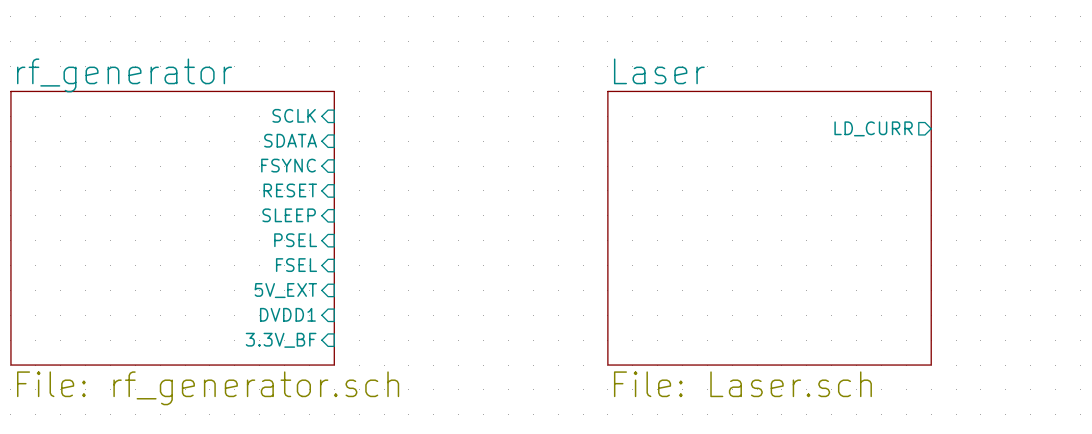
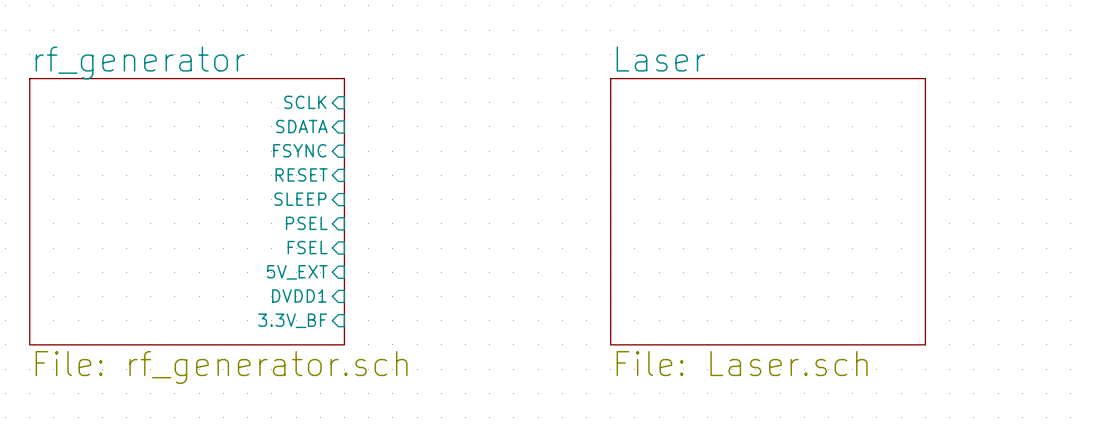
sheet pin: LD_CURR (873, 128) -> none

